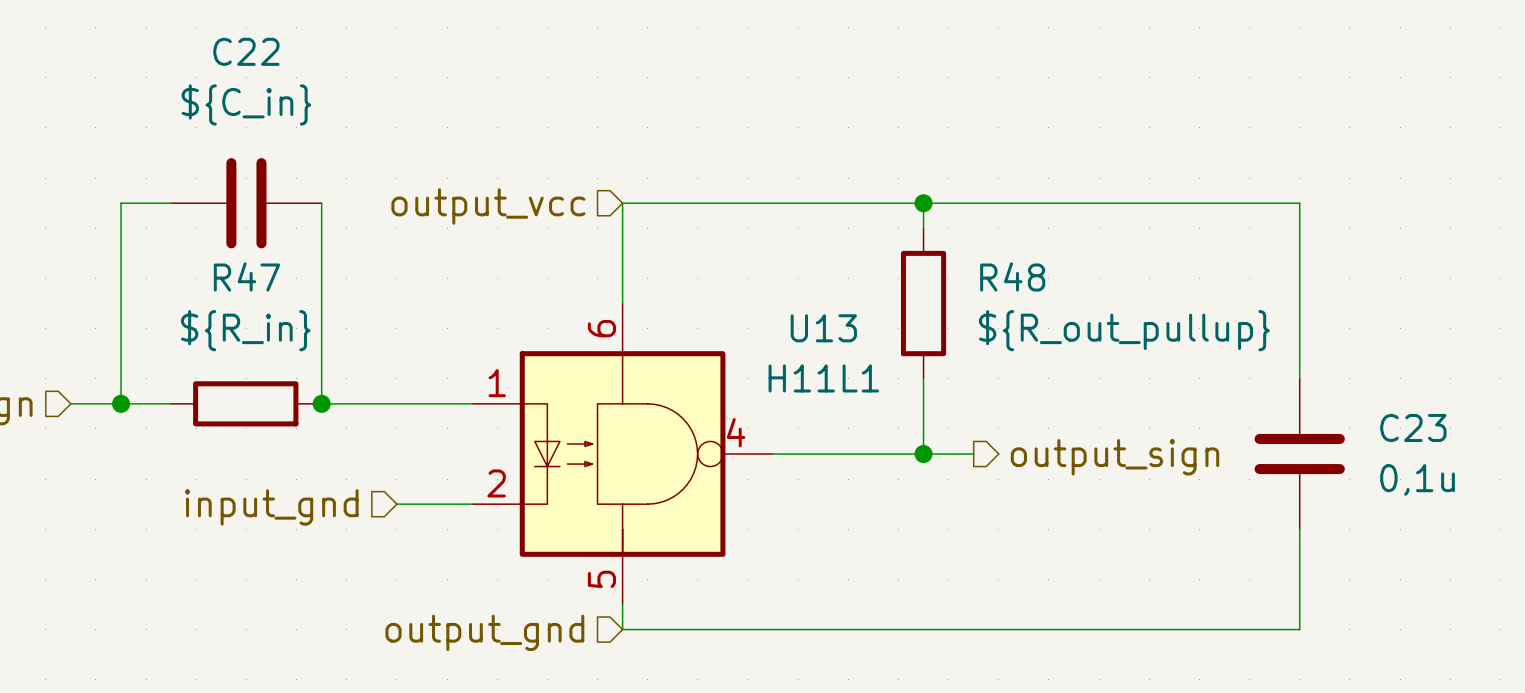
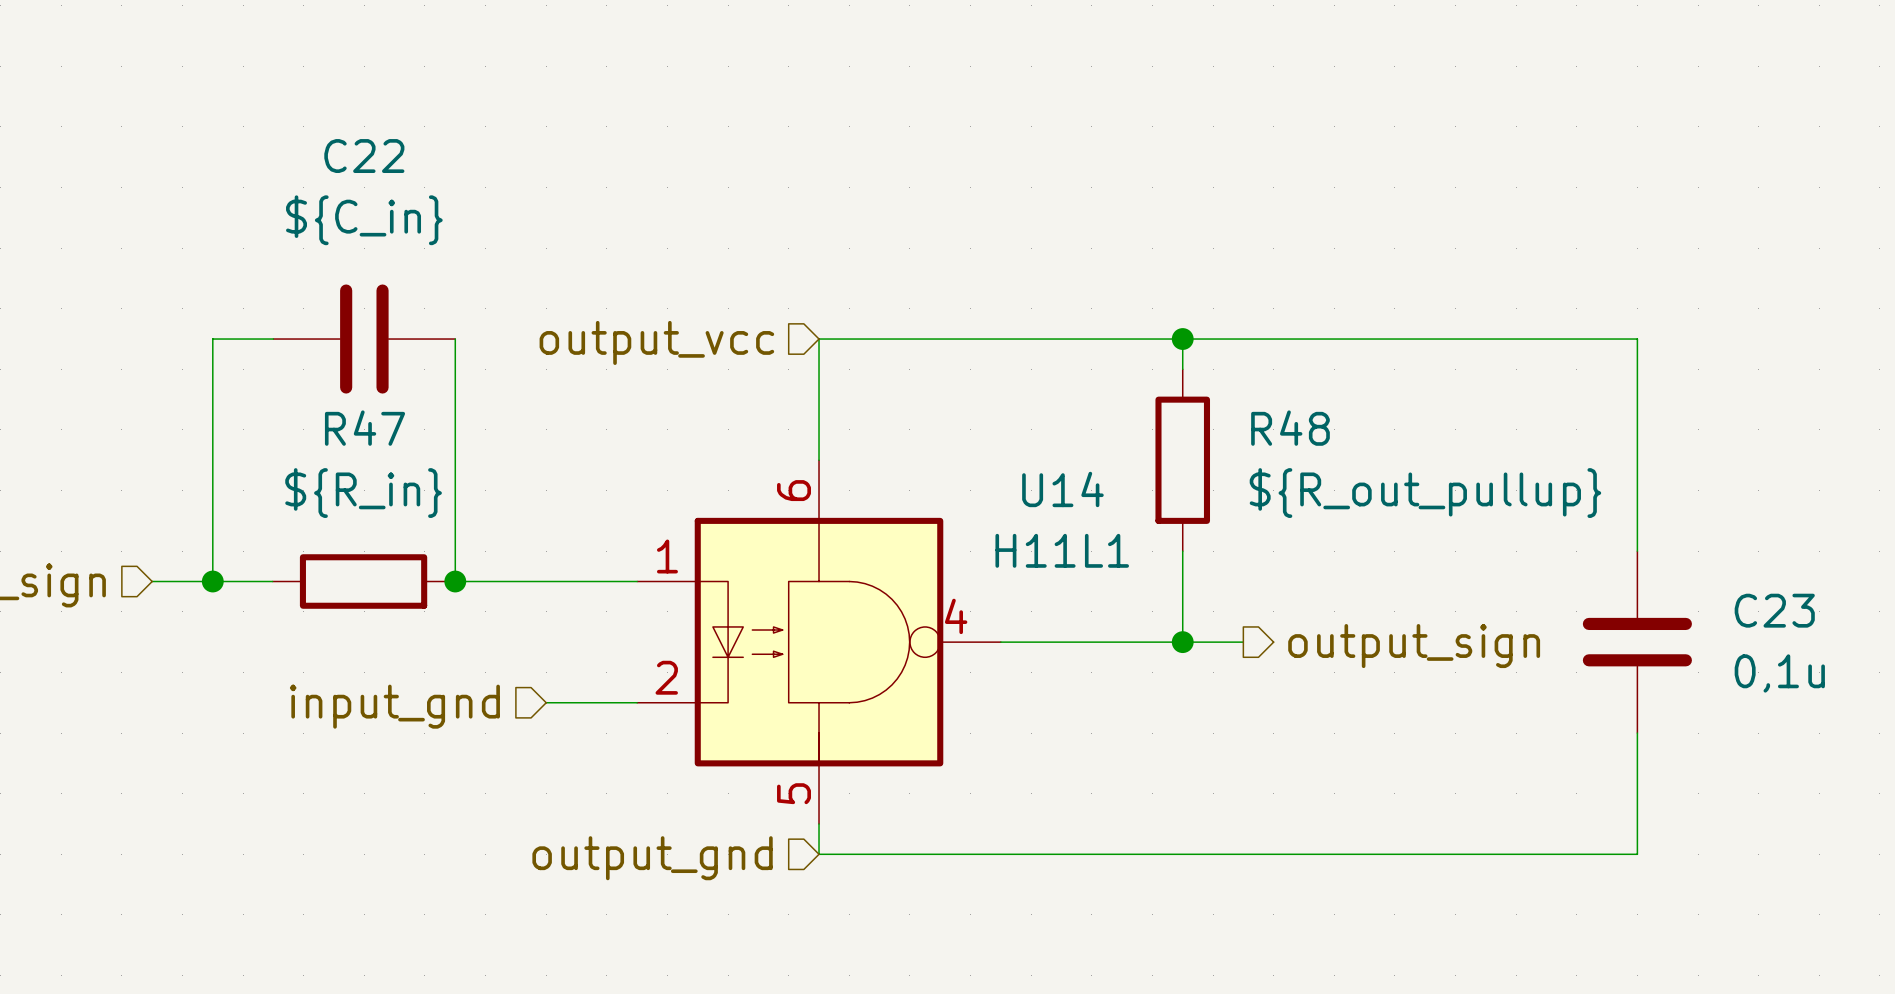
U13 name: U13 (823, 328) -> U14 (1062, 489)

